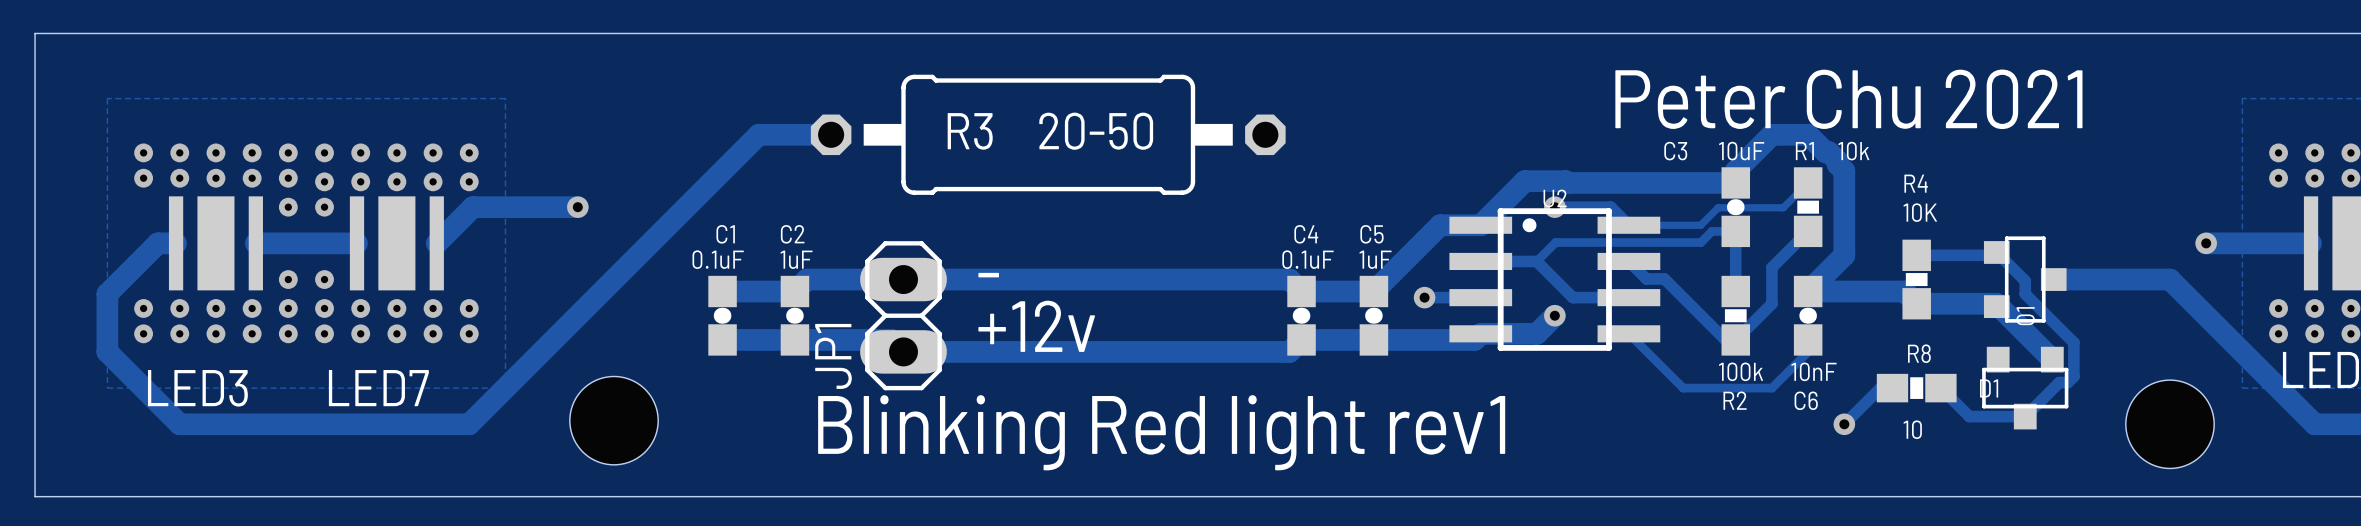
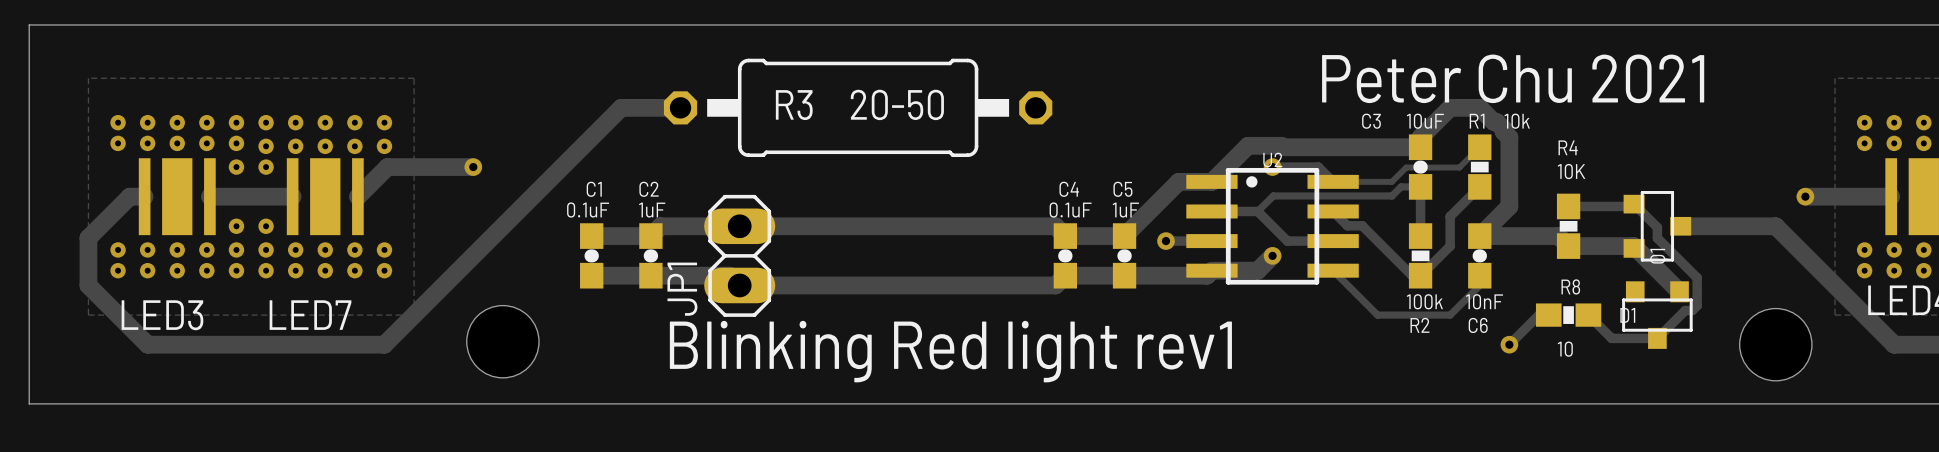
text: - (988, 275) -> none
text: +12v (1036, 326) -> none

